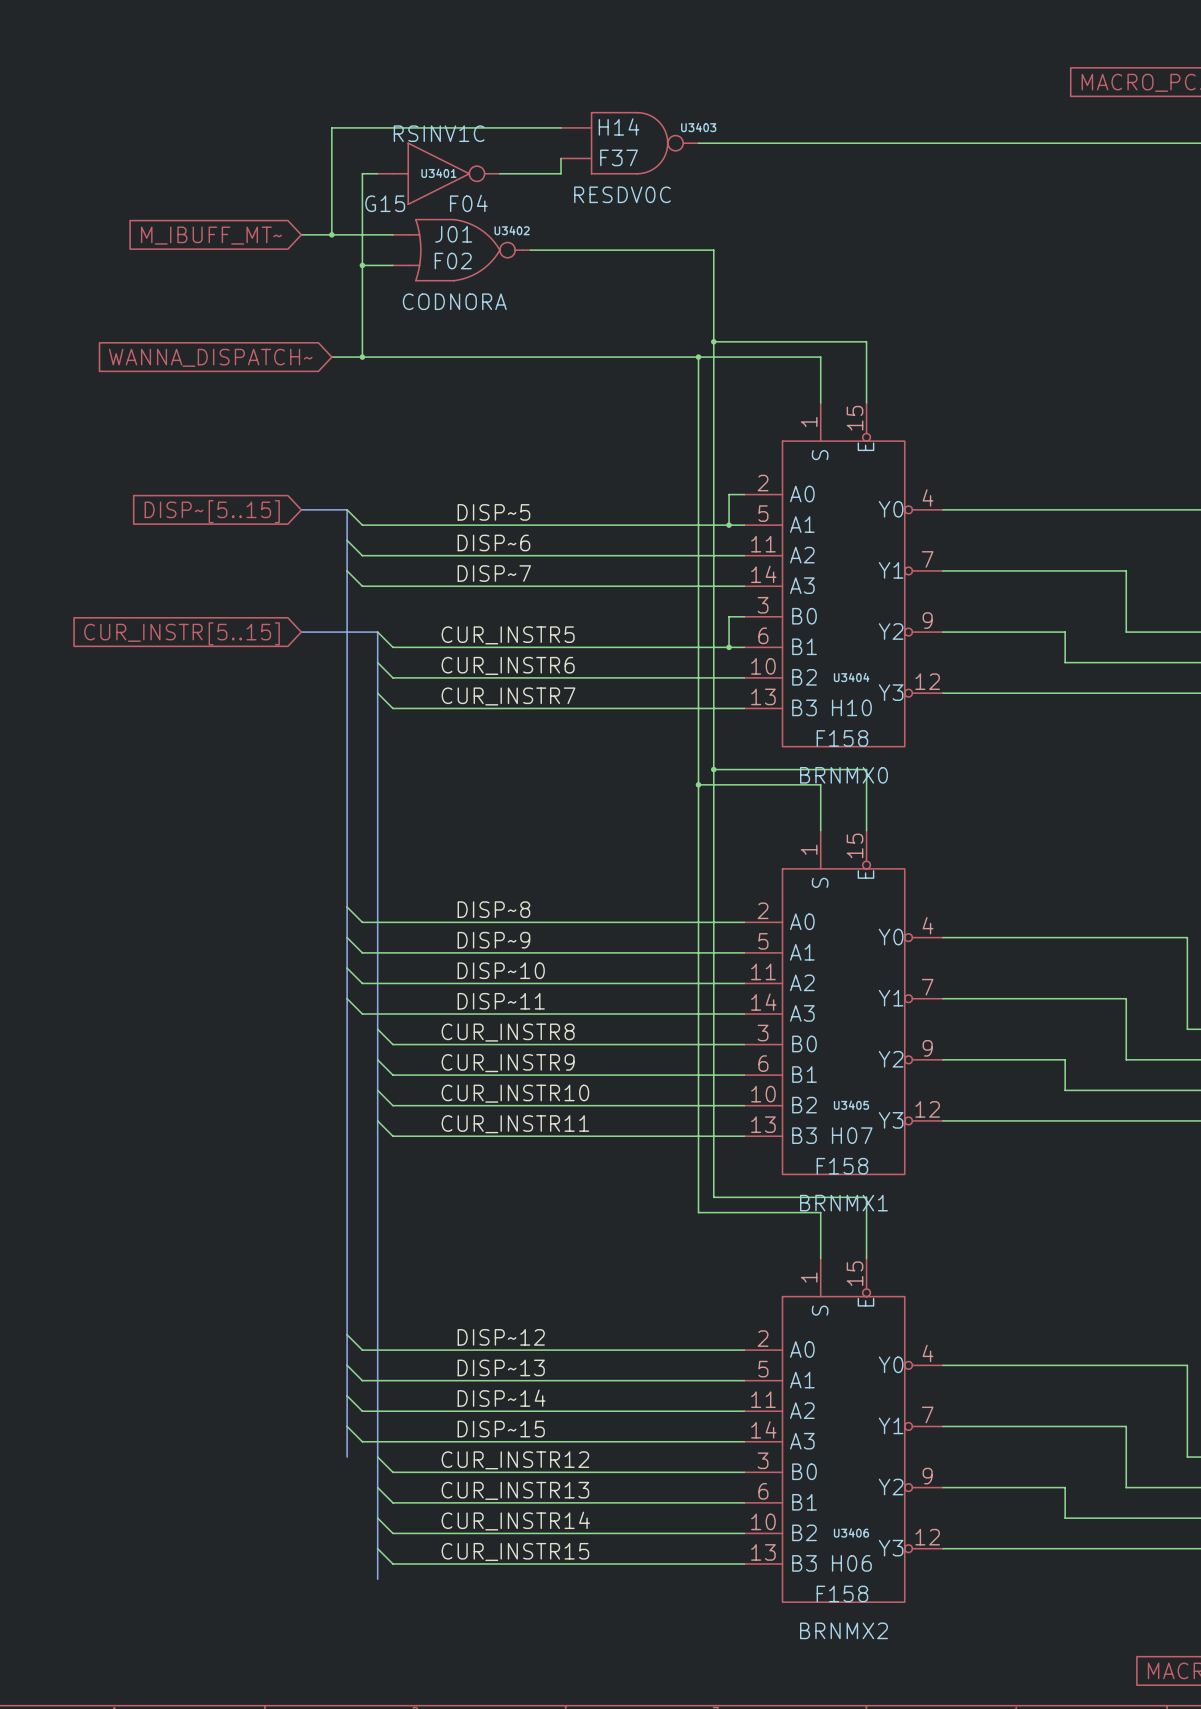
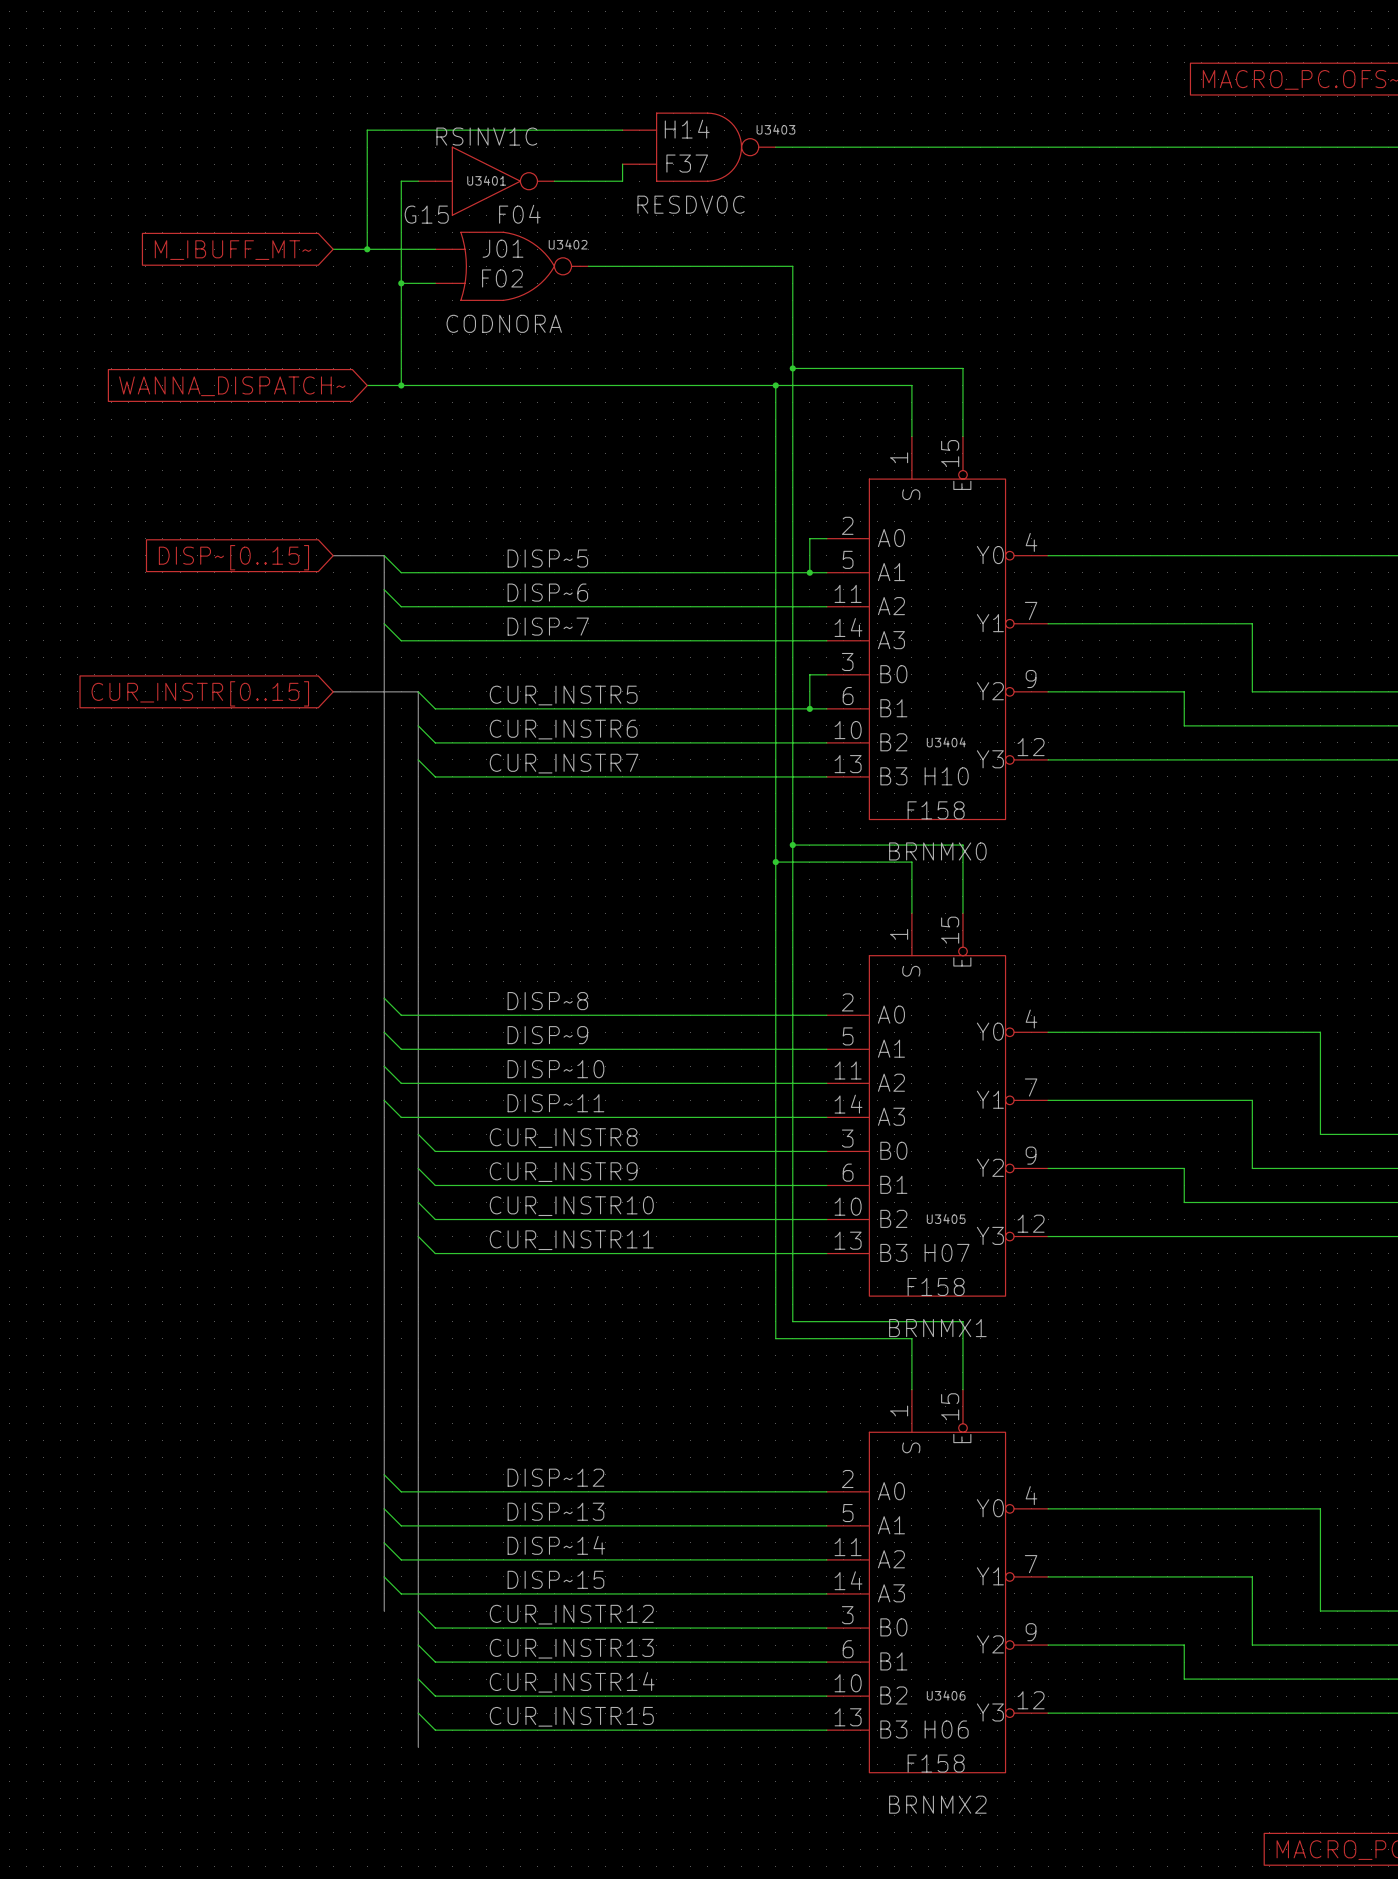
global label: DISP~[5..15] (212, 511) -> DISP~[0..15] (233, 557)
global label: CUR_INSTR[5..15] (182, 633) -> CUR_INSTR[0..15] (200, 693)

